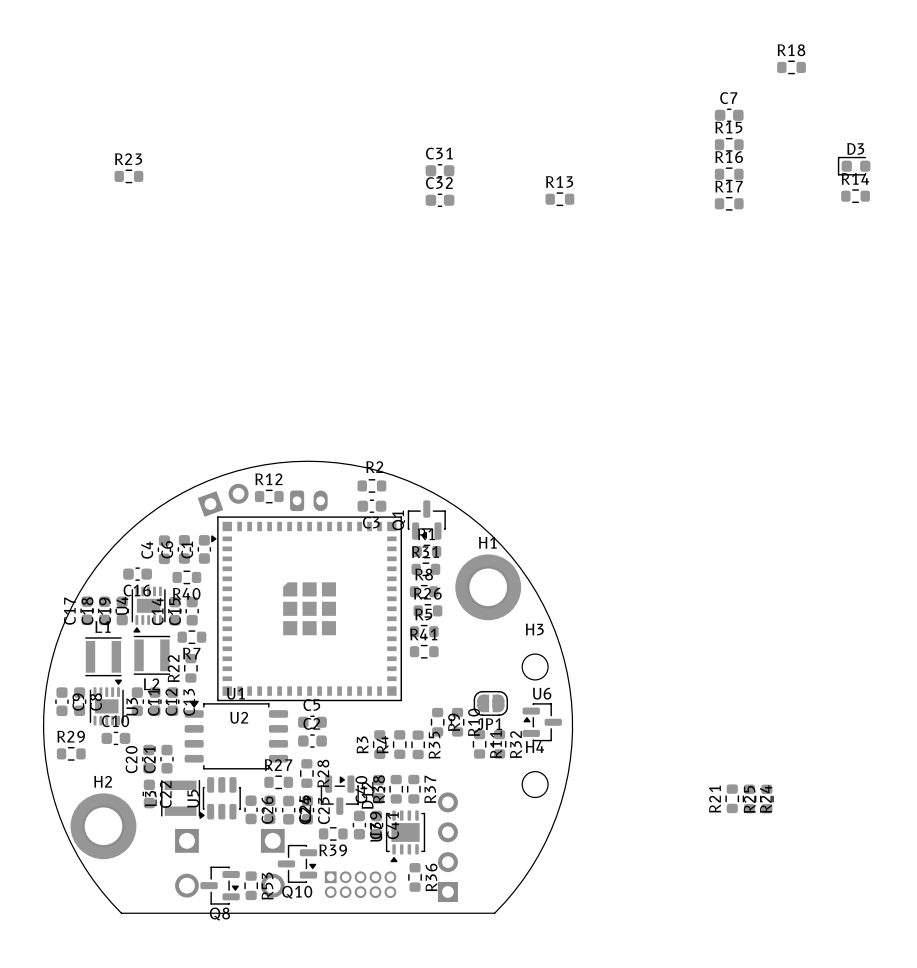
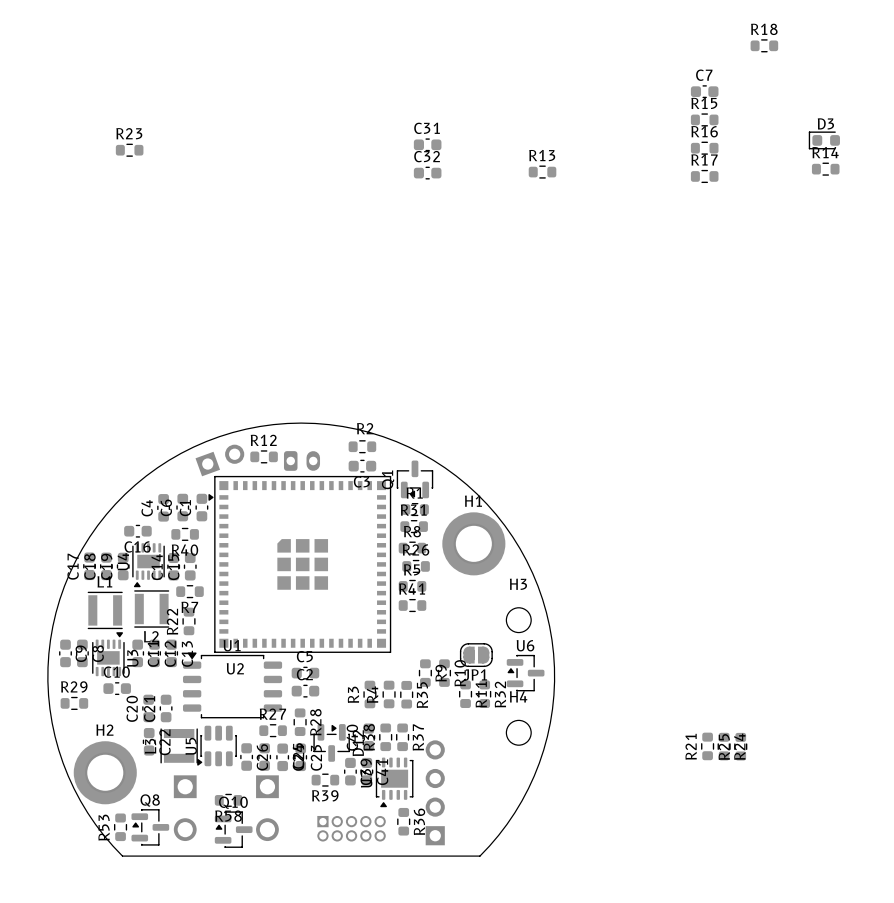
R58: none -> (228, 800)
Q10 rotation: 0° (297, 863) -> 180° (233, 829)
Q10 position: (297, 863) -> (233, 829)
Q8 rotation: 0° (220, 885) -> 180° (150, 827)
Q8 position: (220, 885) -> (150, 827)
R53 position: (251, 885) -> (120, 827)
R53 name position: R53 (267, 886) -> R53 (104, 827)

